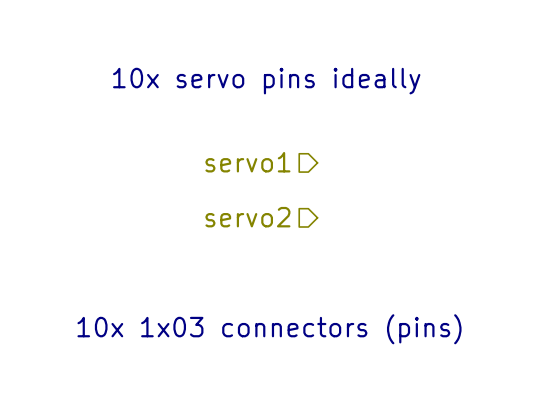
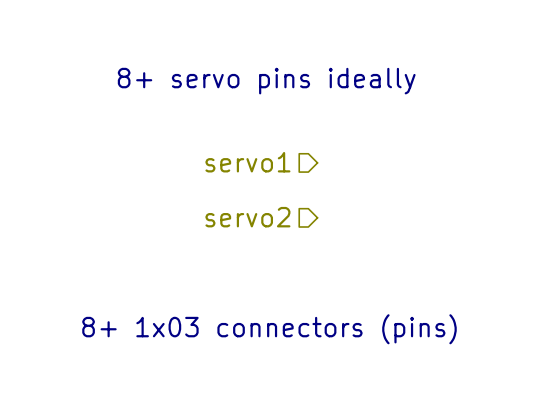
text: 10x servo pins ideally (266, 81) -> 8+ servo pins ideally (266, 81)
text: 10x 1x03 connectors (pins) (269, 329) -> 8+ 1x03 connectors (pins) (269, 329)

